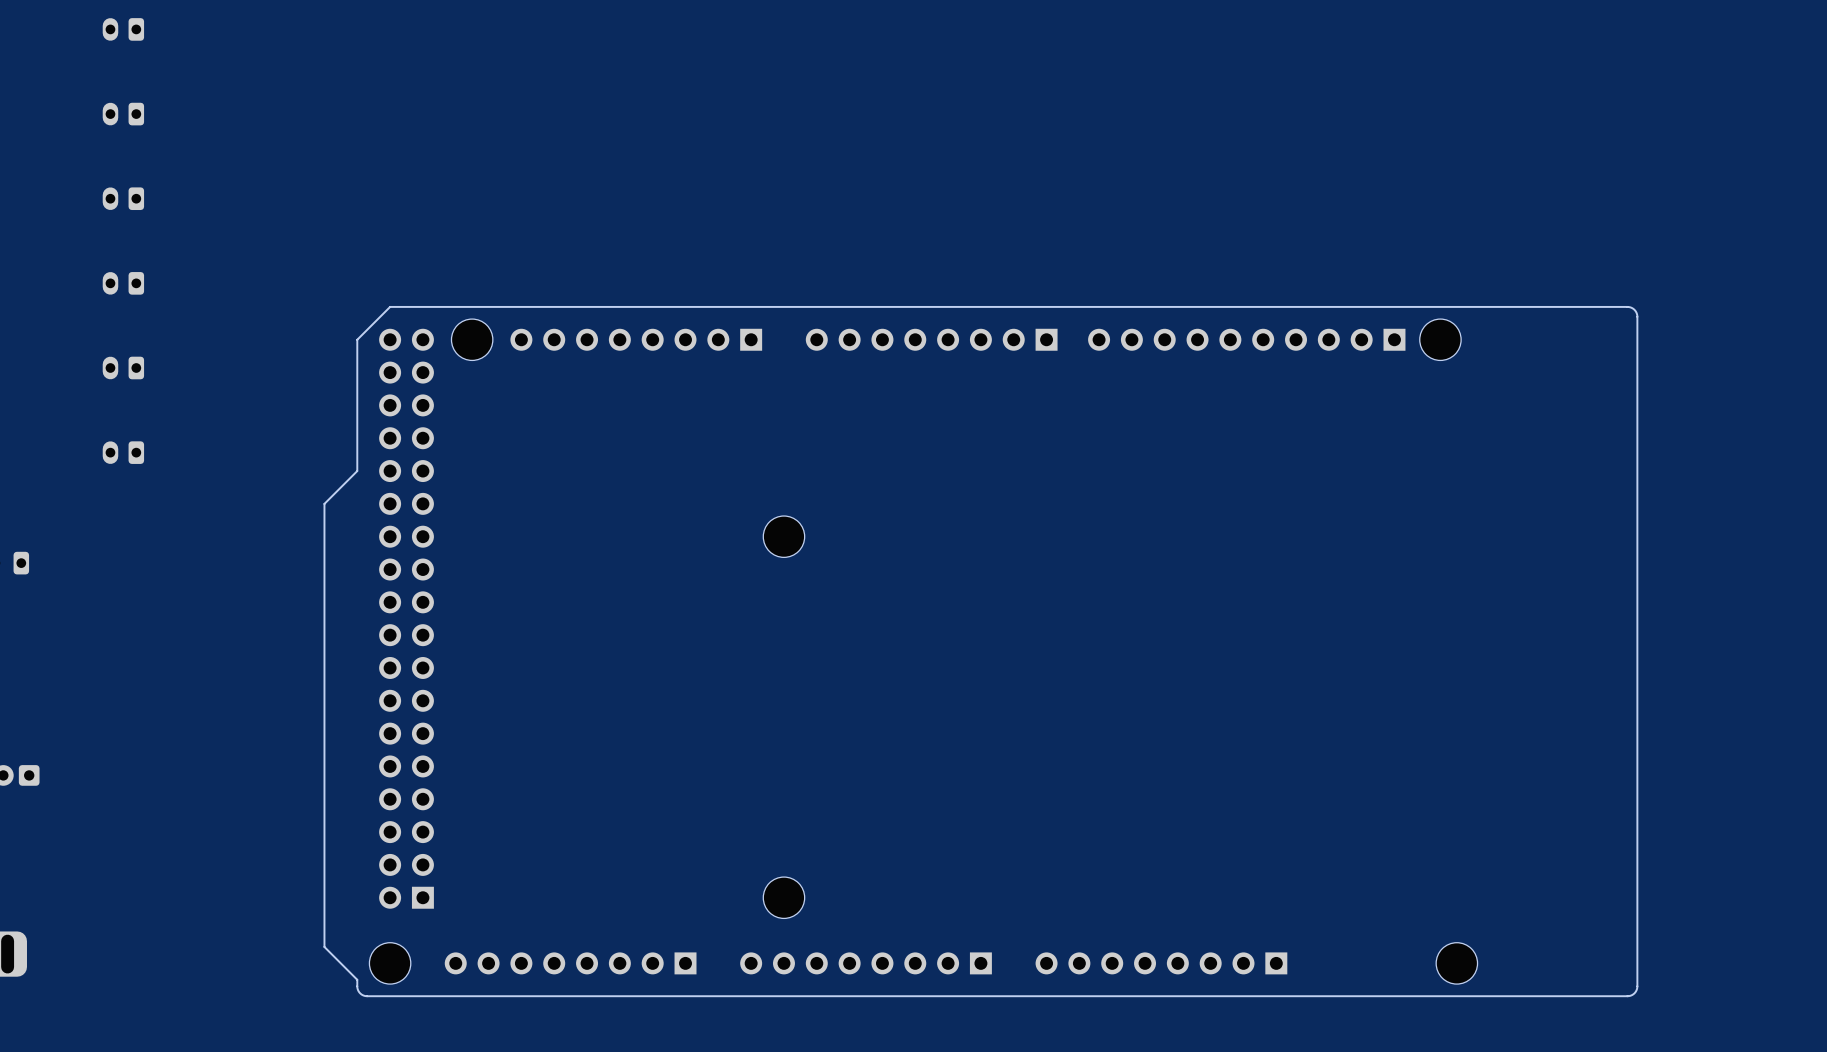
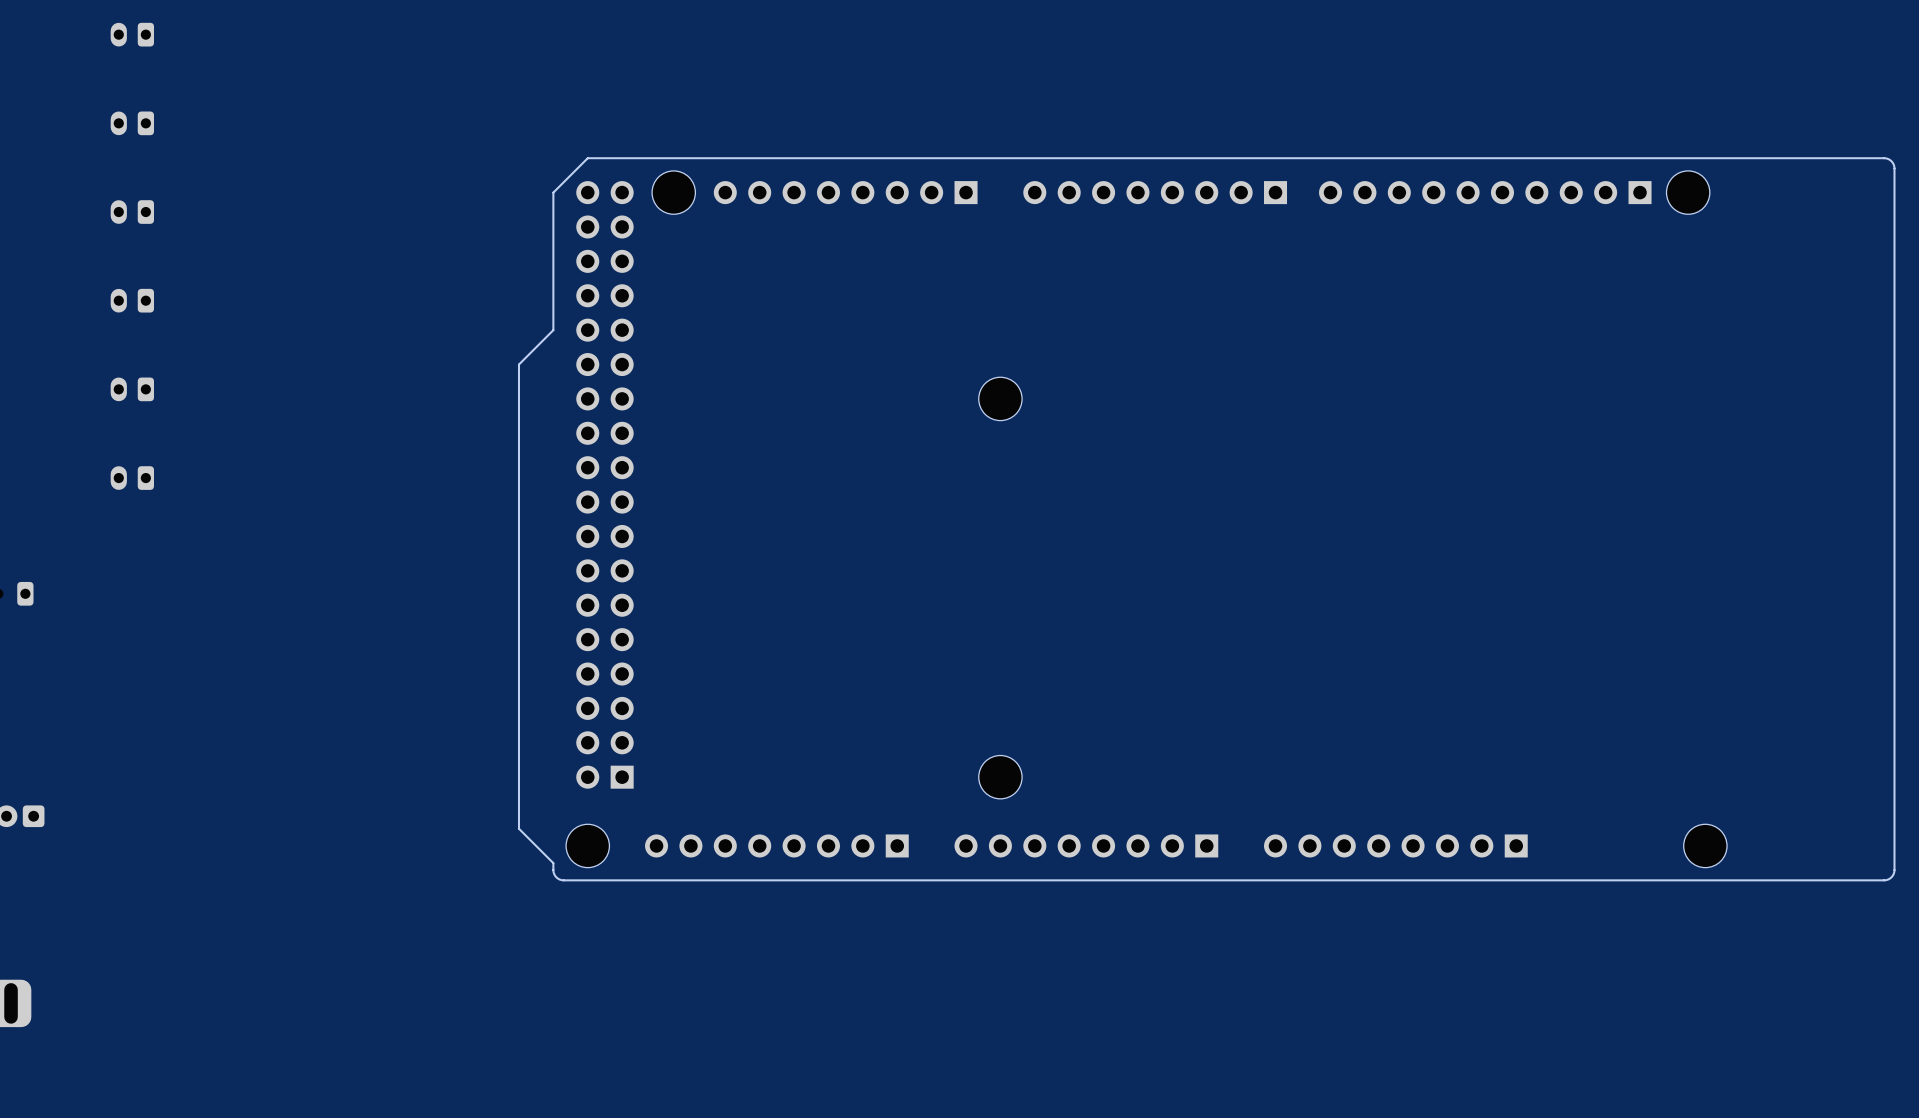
part: none -> (673, 192)
part: none -> (845, 192)
part: none -> (1155, 192)
board edge: (1627, 306) (390, 306) (357, 339) (357, 471) (324, 503) (324, 946) (357, 979) (359, 992) (367, 996) (1631, 995) (1636, 991) (1637, 986) (1637, 316) (1634, 309) (1627, 306) -> (1884, 158) (587, 158) (553, 192) (553, 330) (518, 364) (518, 828) (553, 863) (555, 876) (563, 880) (1888, 879) (1892, 876) (1894, 870) (1894, 168) (1891, 161) (1884, 158)
part: (472, 339) -> none
part: (636, 339) -> none
part: (931, 339) -> none
part position: (1246, 339) -> (1485, 192)
part position: (1440, 339) -> (1688, 192)
part: none -> (1000, 398)
part: (783, 536) -> none
part position: (406, 618) -> (604, 484)
part: none -> (1000, 777)
part: none -> (587, 845)
part: none -> (776, 845)
part: none -> (1086, 845)
part: none -> (1395, 845)
part: (783, 897) -> none
part: (390, 963) -> none
part: (570, 963) -> none
part: (866, 963) -> none
part: (1161, 963) -> none
part position: (1456, 963) -> (1705, 845)

